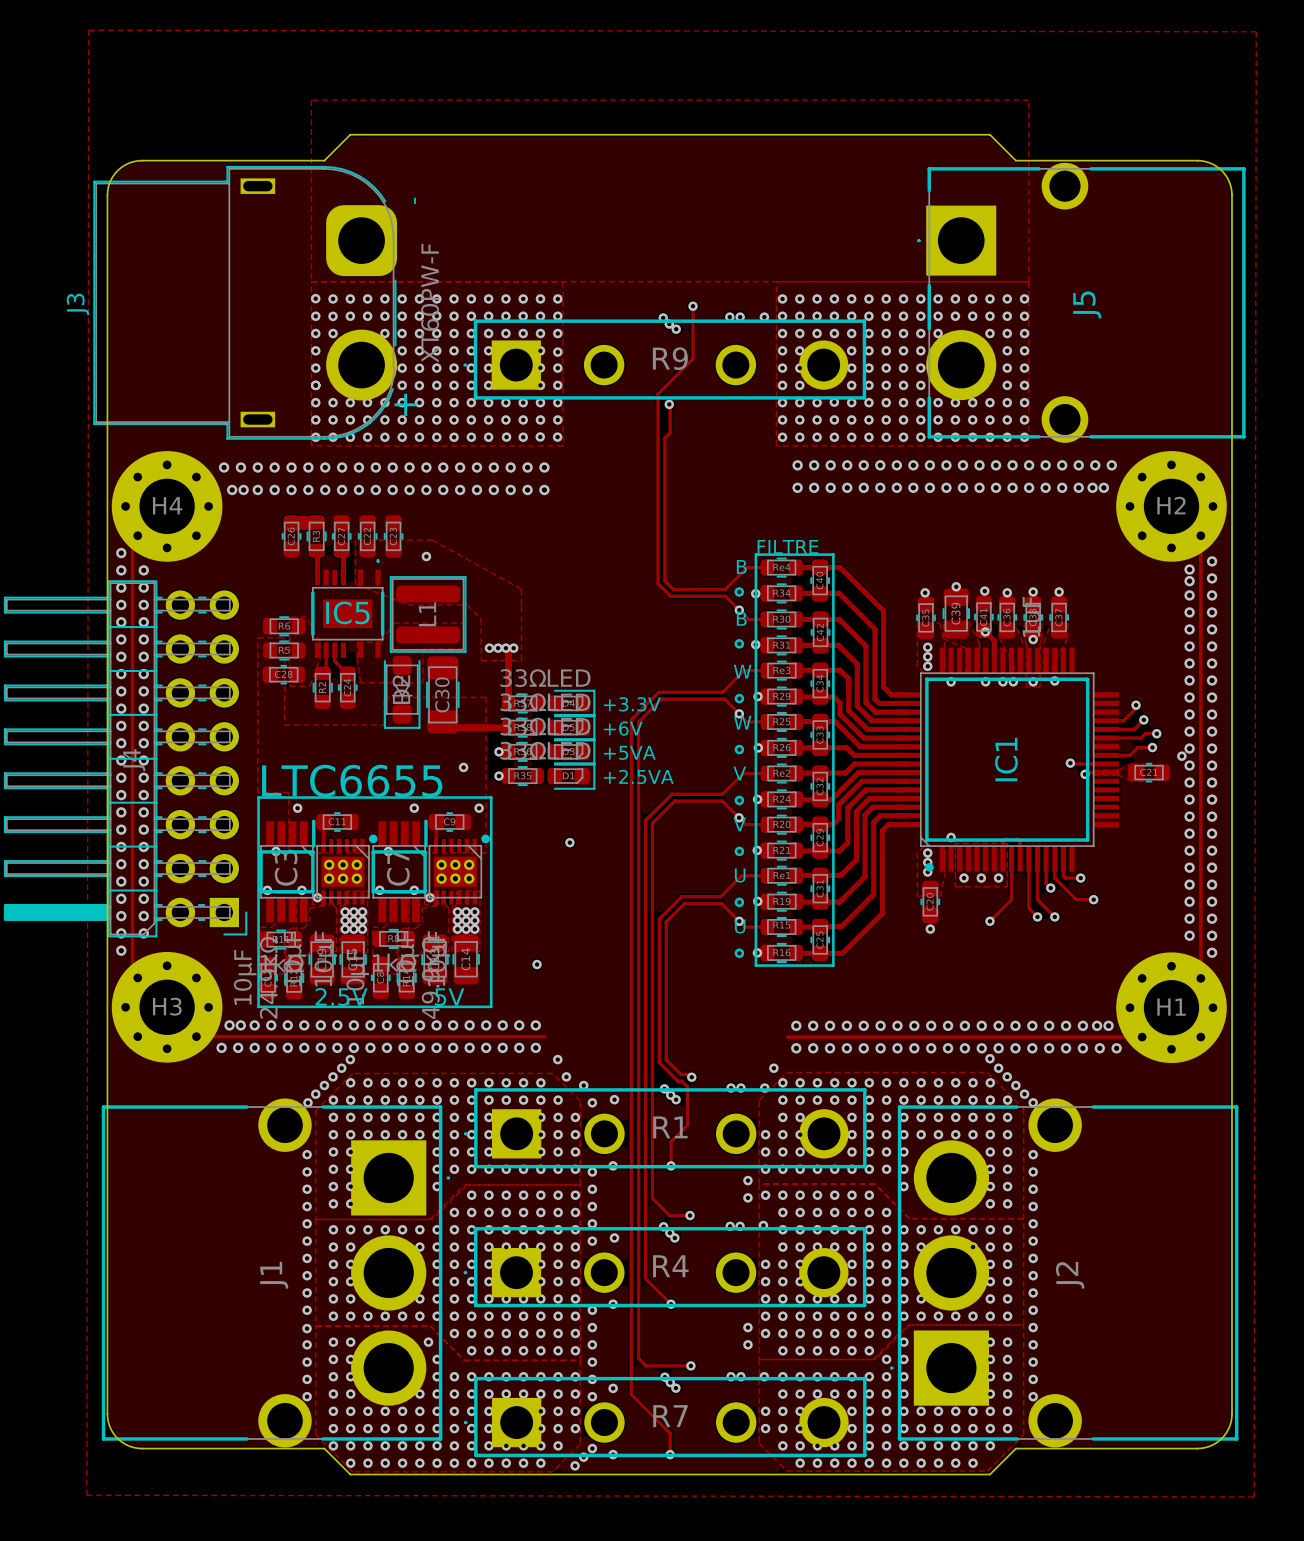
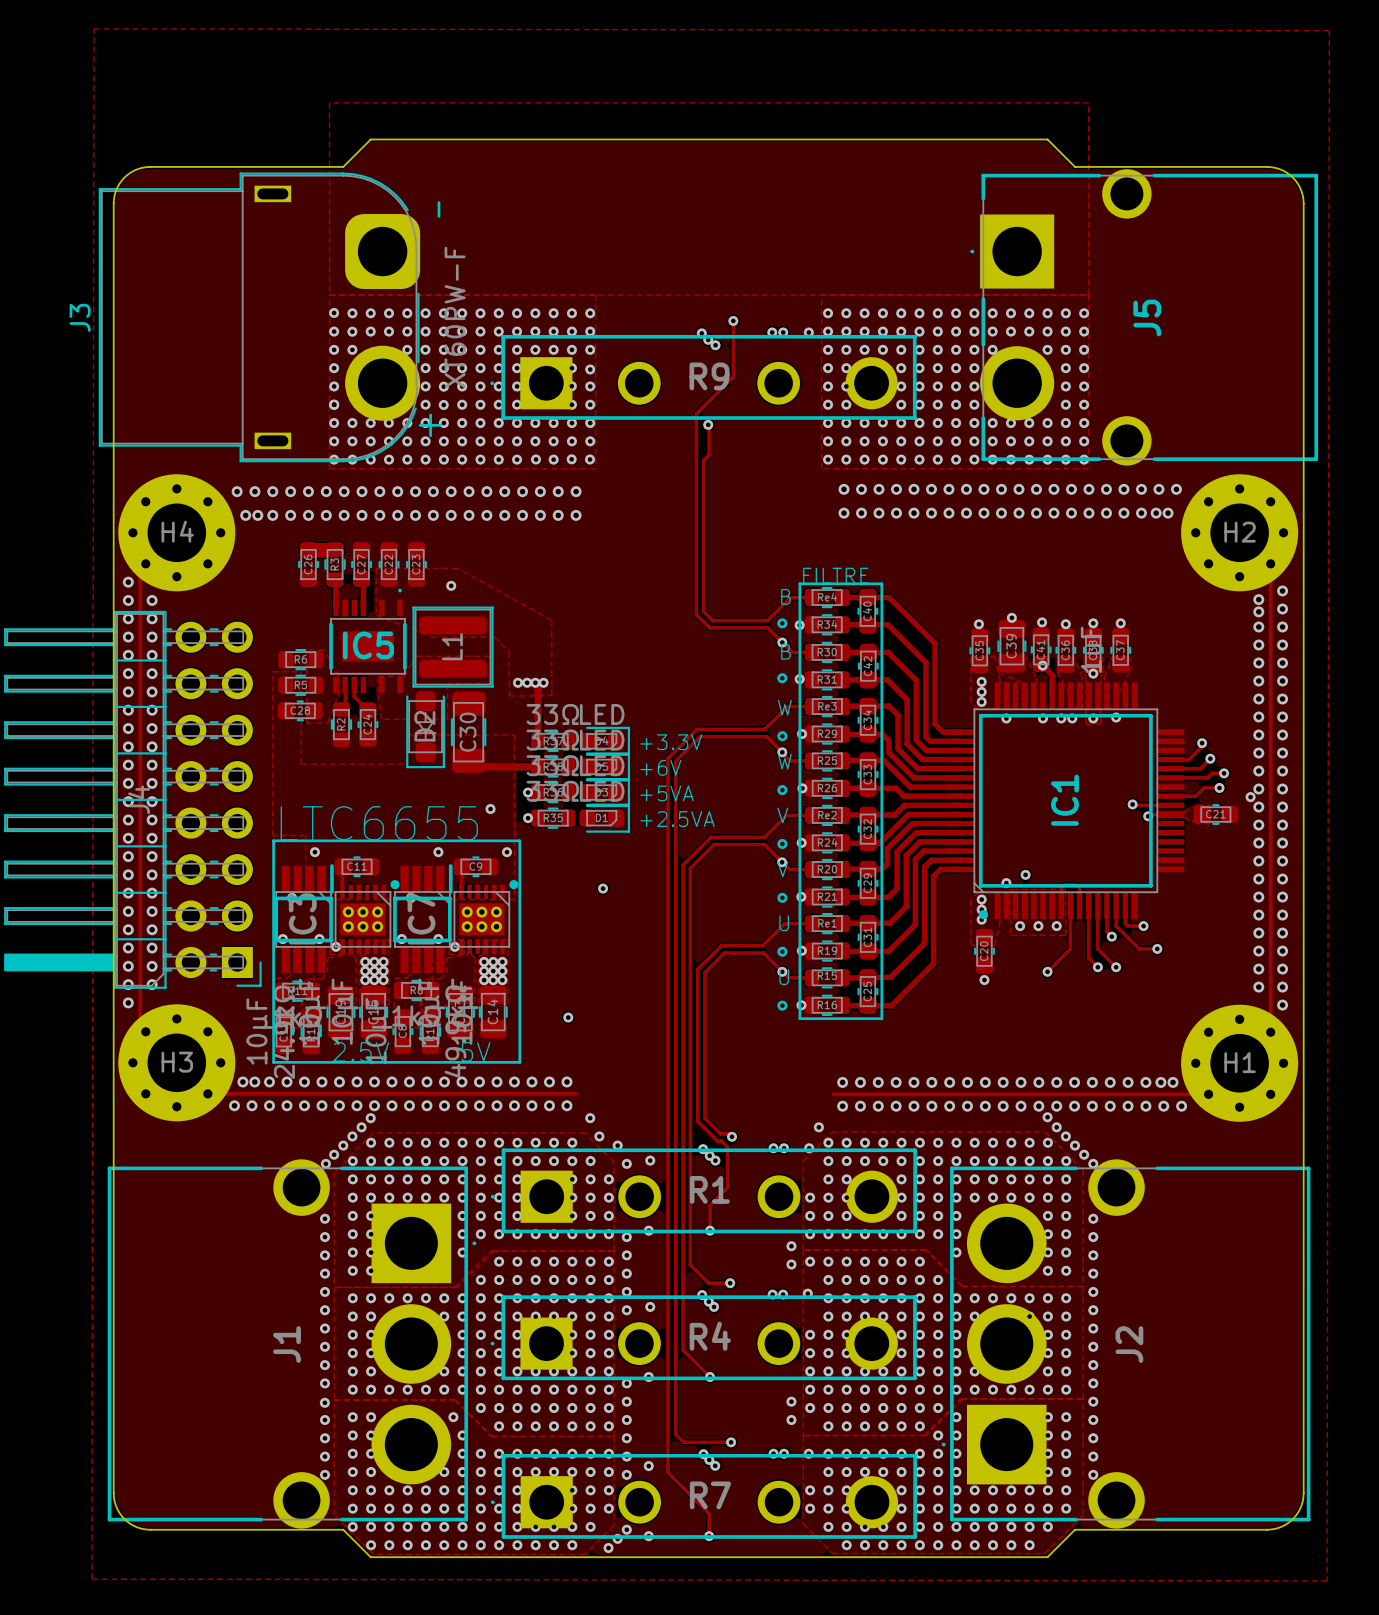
via: none -> (1025, 874)

